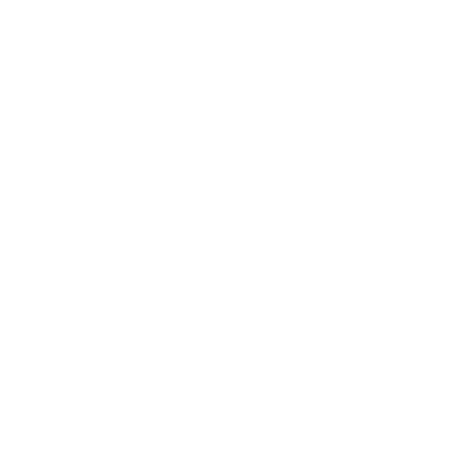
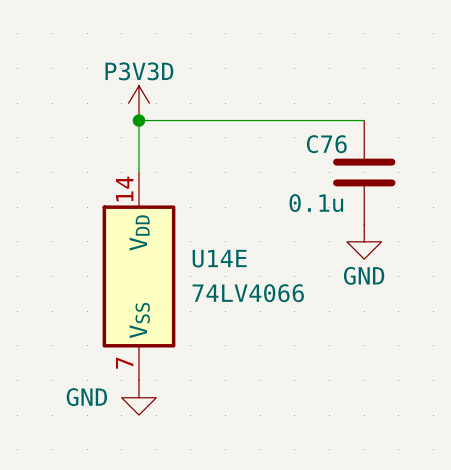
power symbol: none -> P3V3D (138, 103)
junction: none -> (138, 120)
wire: none -> (364, 120) (138, 120) (138, 172)
C76: none -> 0.1u (364, 172)
power symbol: none -> GND (364, 241)
U14E: none -> 74LV4066 (138, 276)
power symbol: none -> GND (138, 397)

